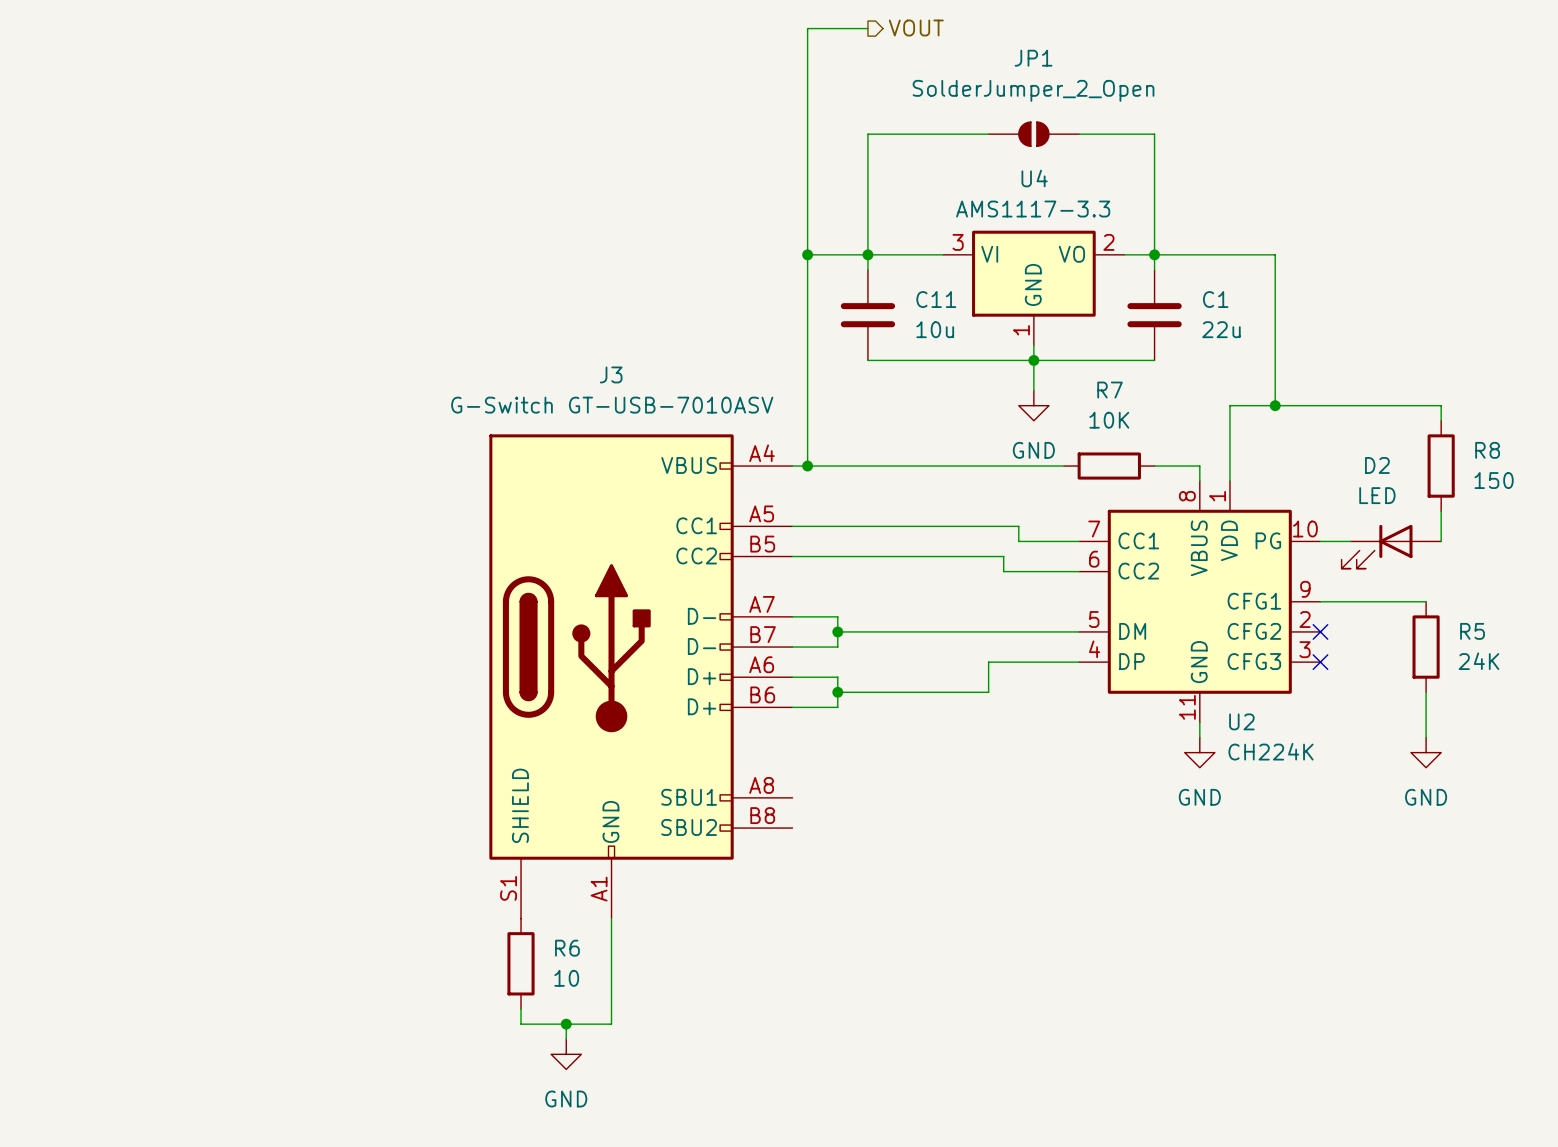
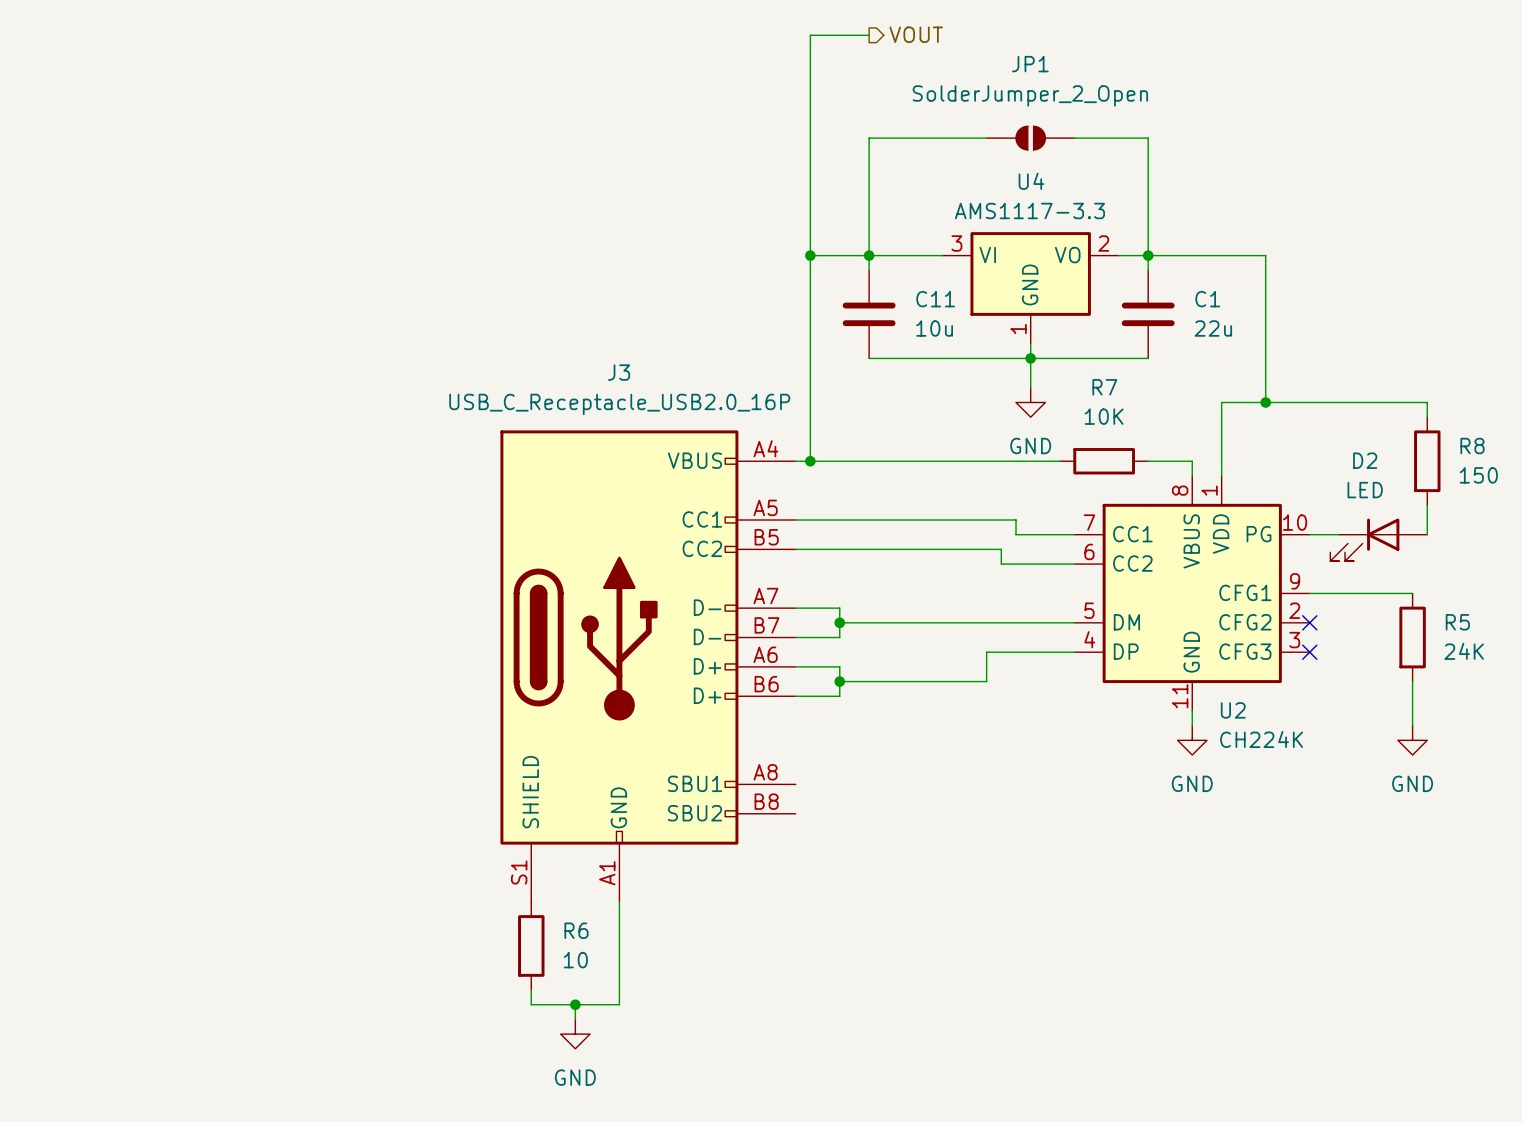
J3 value: G-Switch GT-USB-7010ASV (612, 405) -> USB_C_Receptacle_USB2.0_16P (619, 404)

